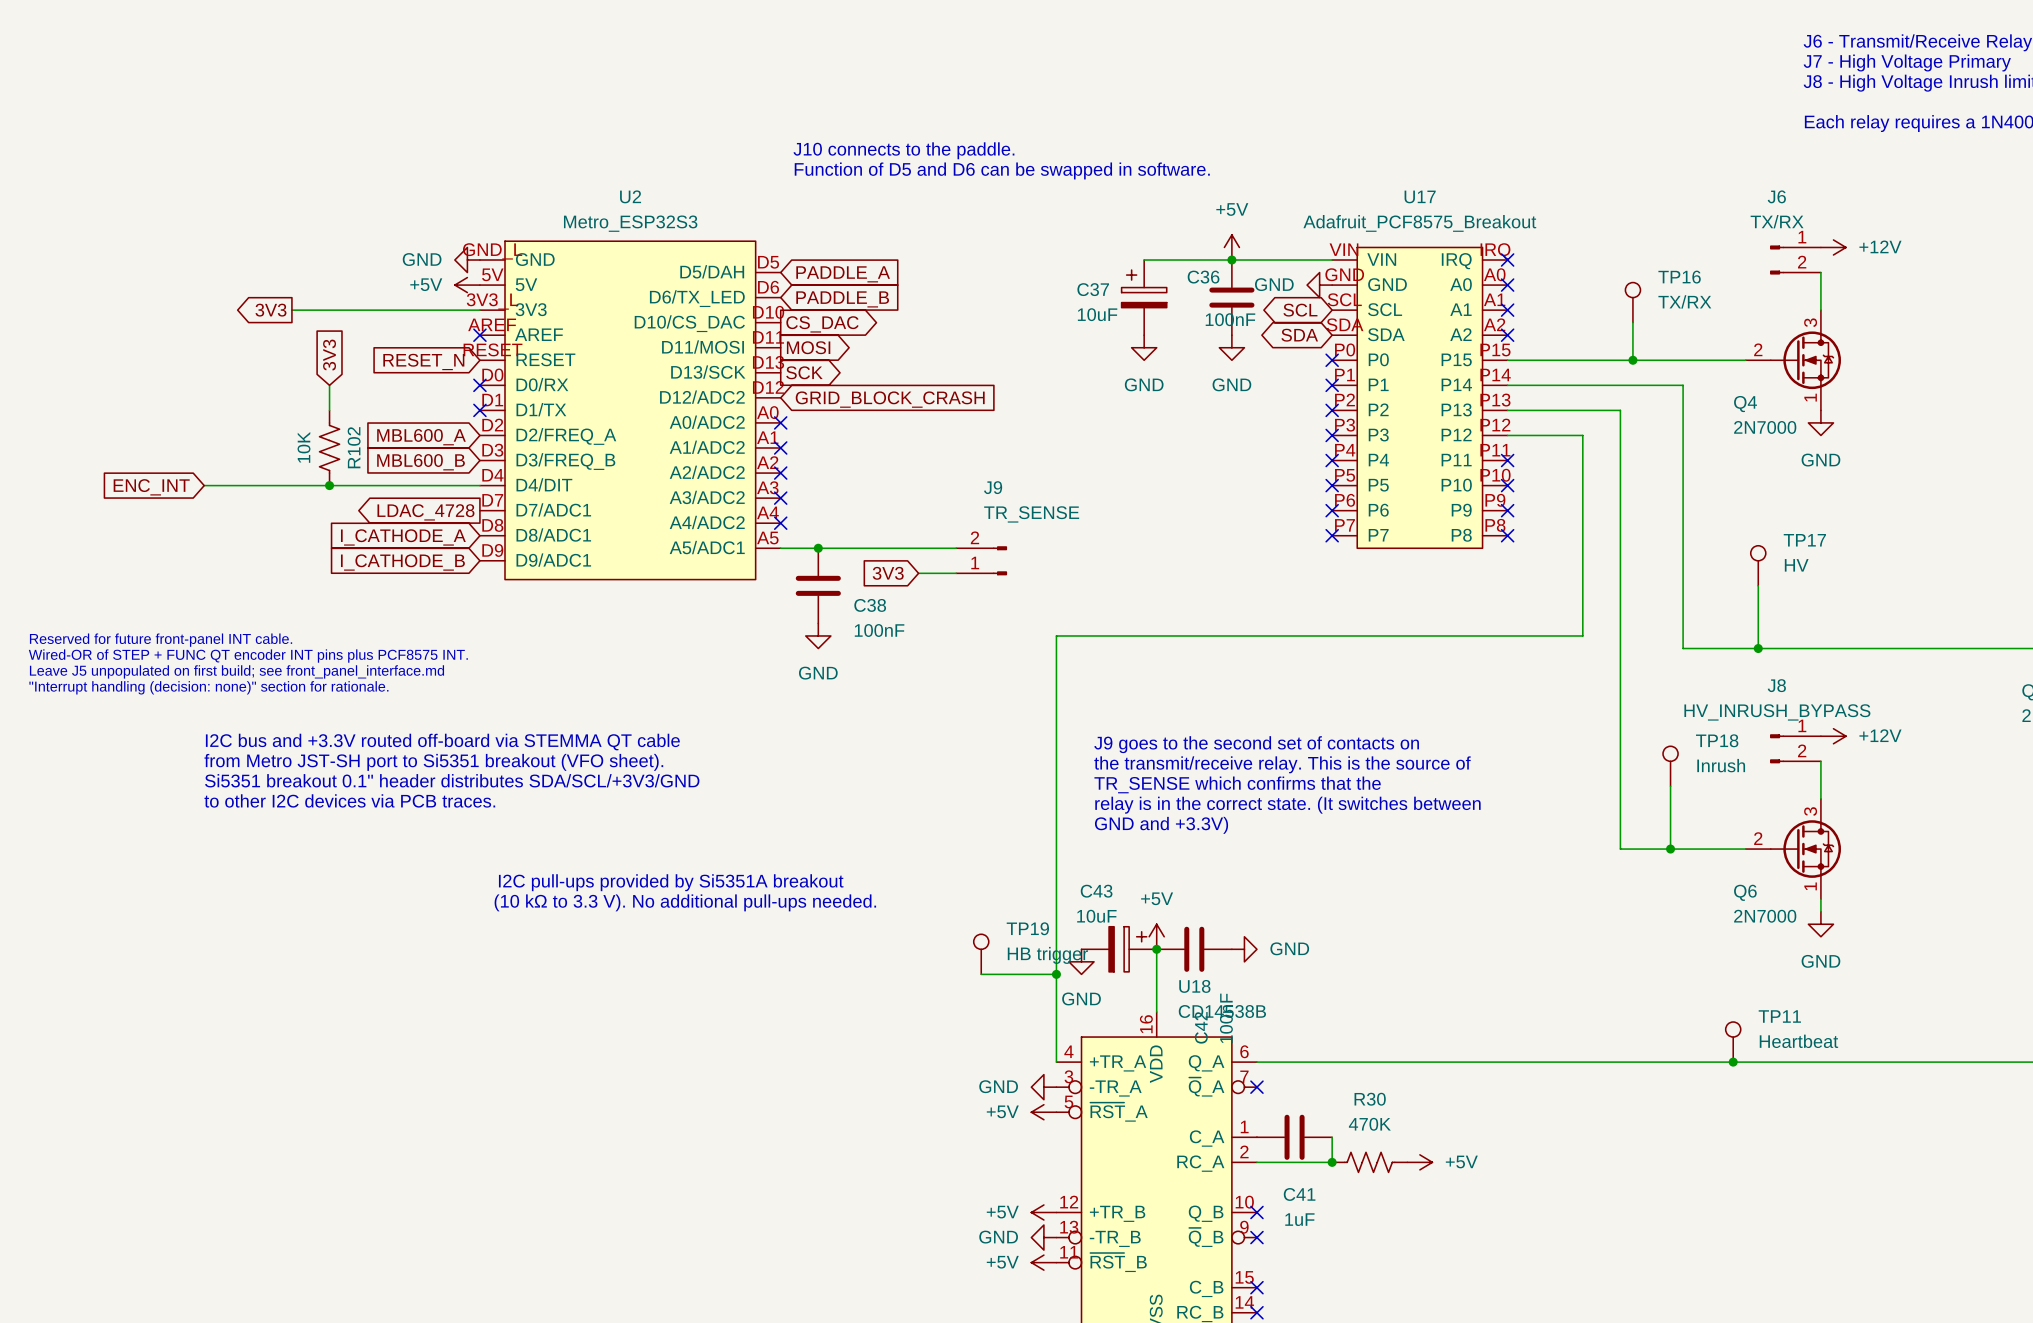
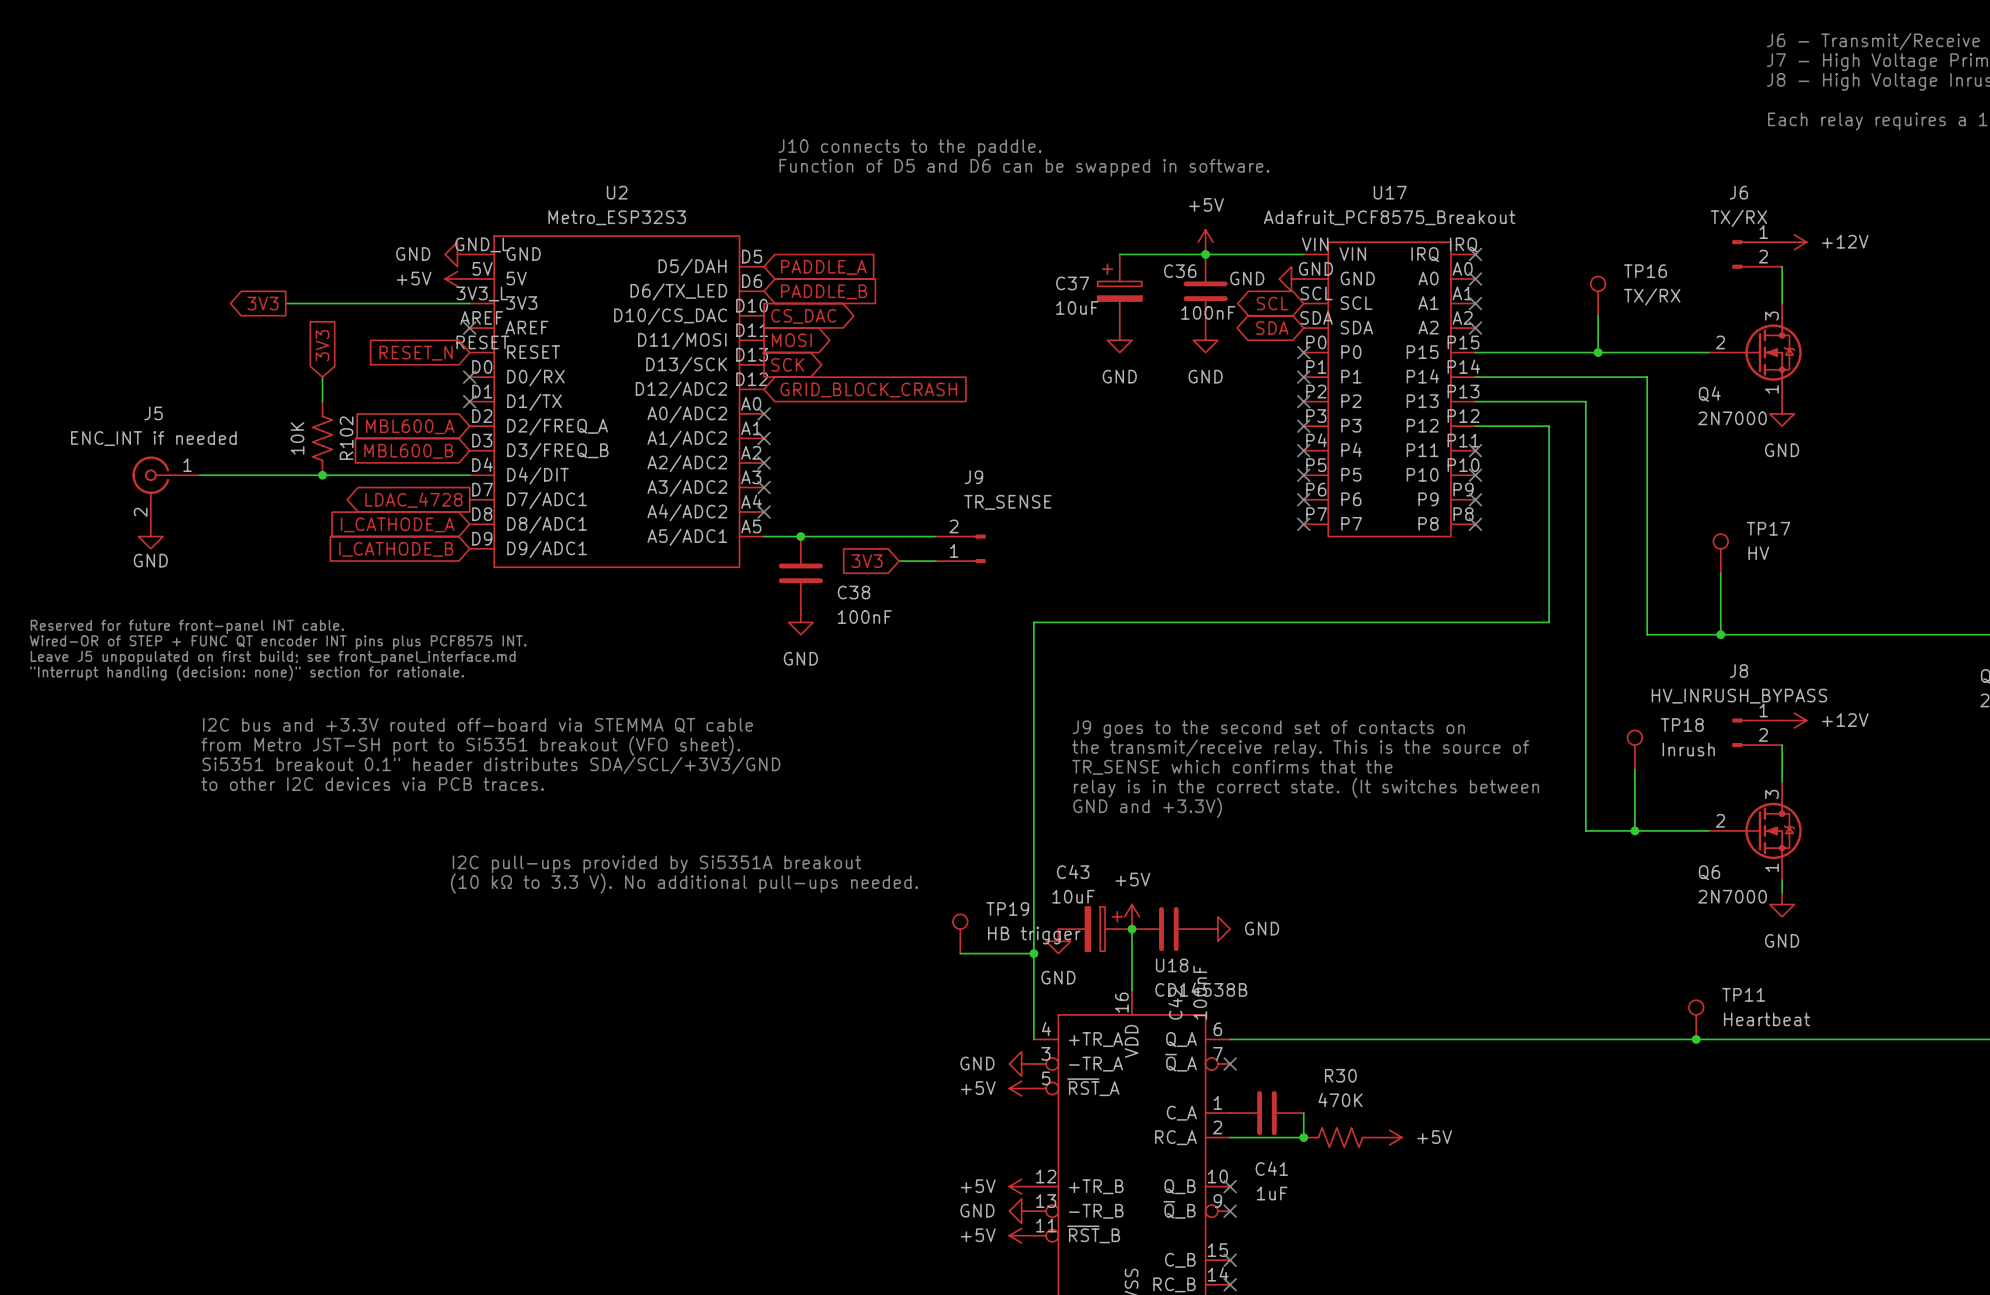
global label: ENC_INT (151, 487) -> none
J5: none -> ENC_INT if needed (166, 490)
power symbol: none -> GND (150, 536)

